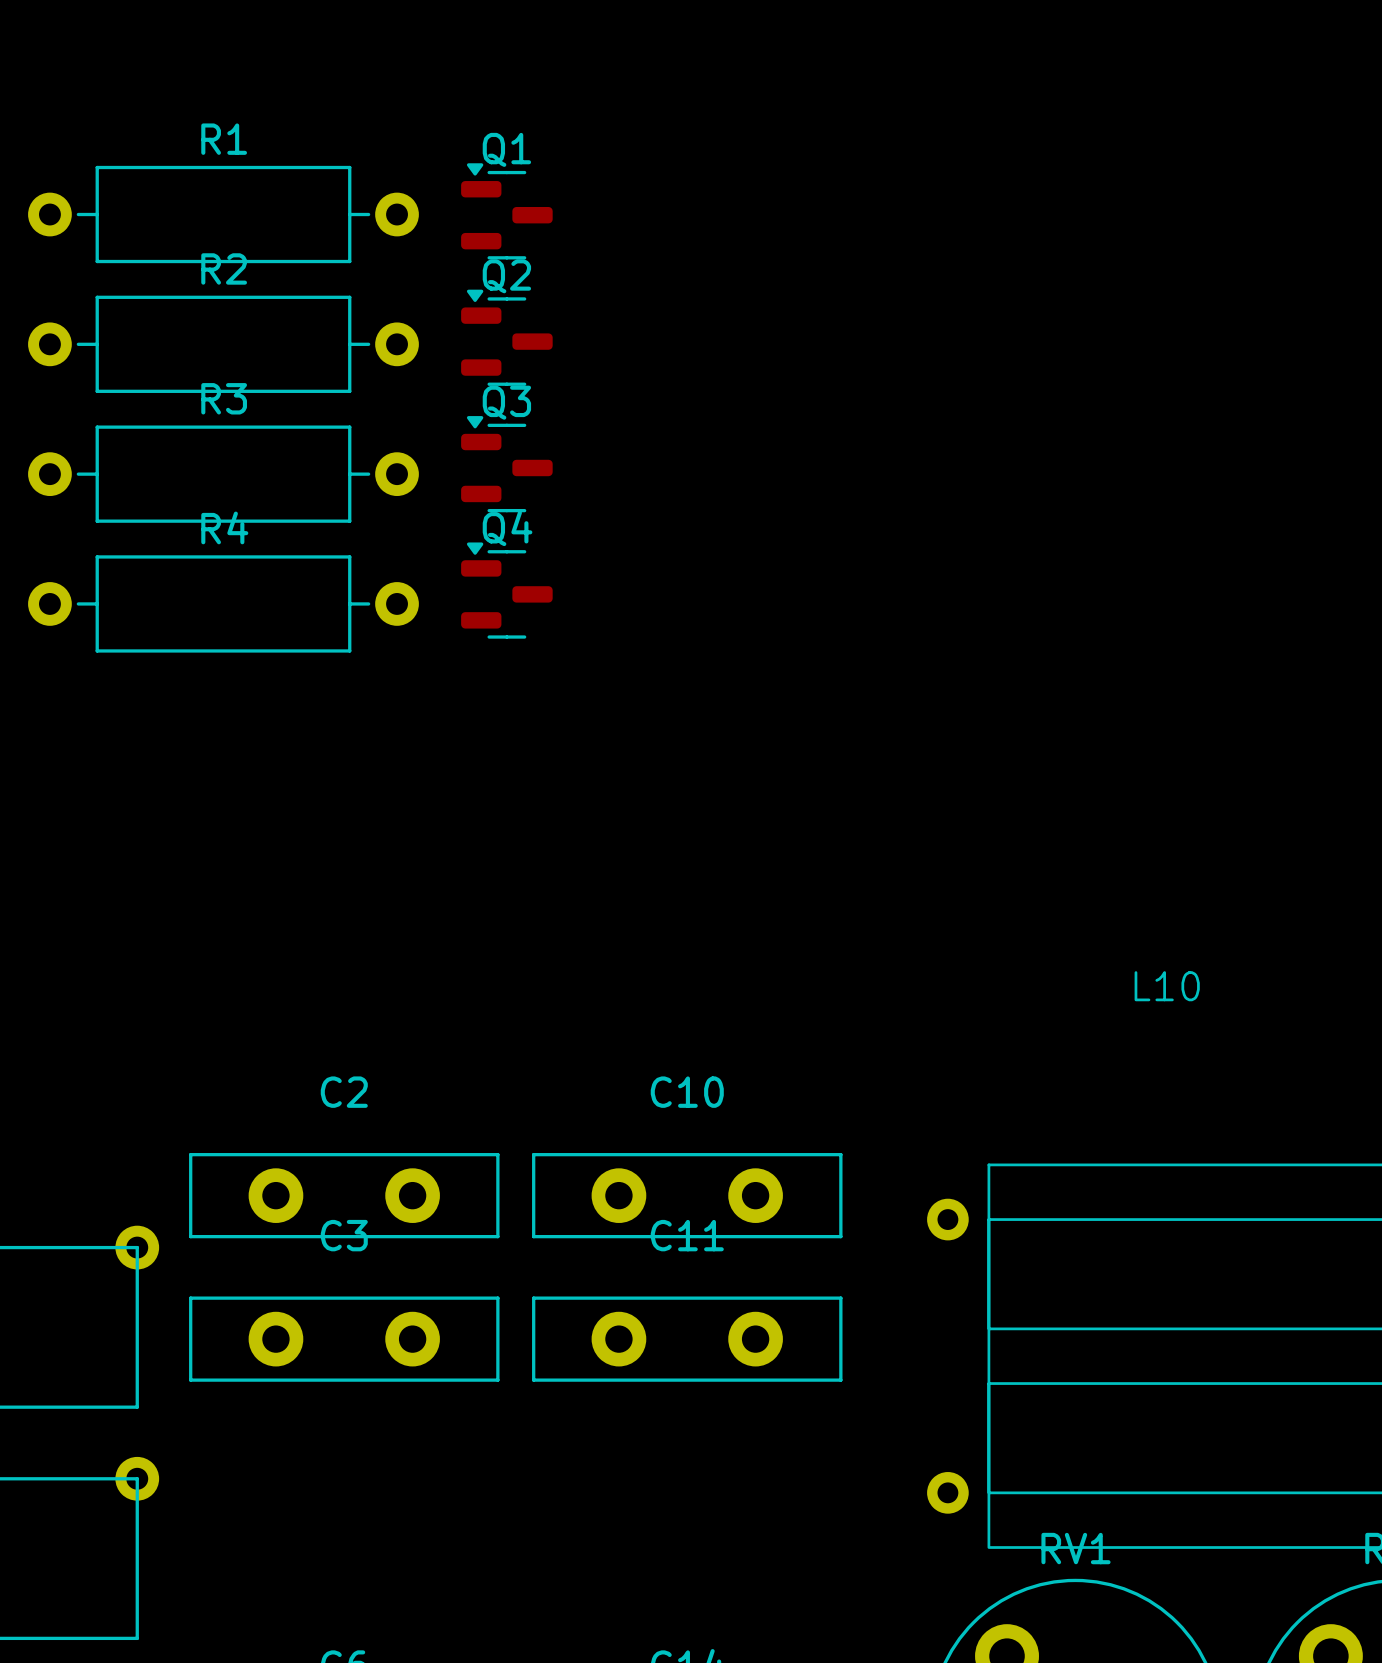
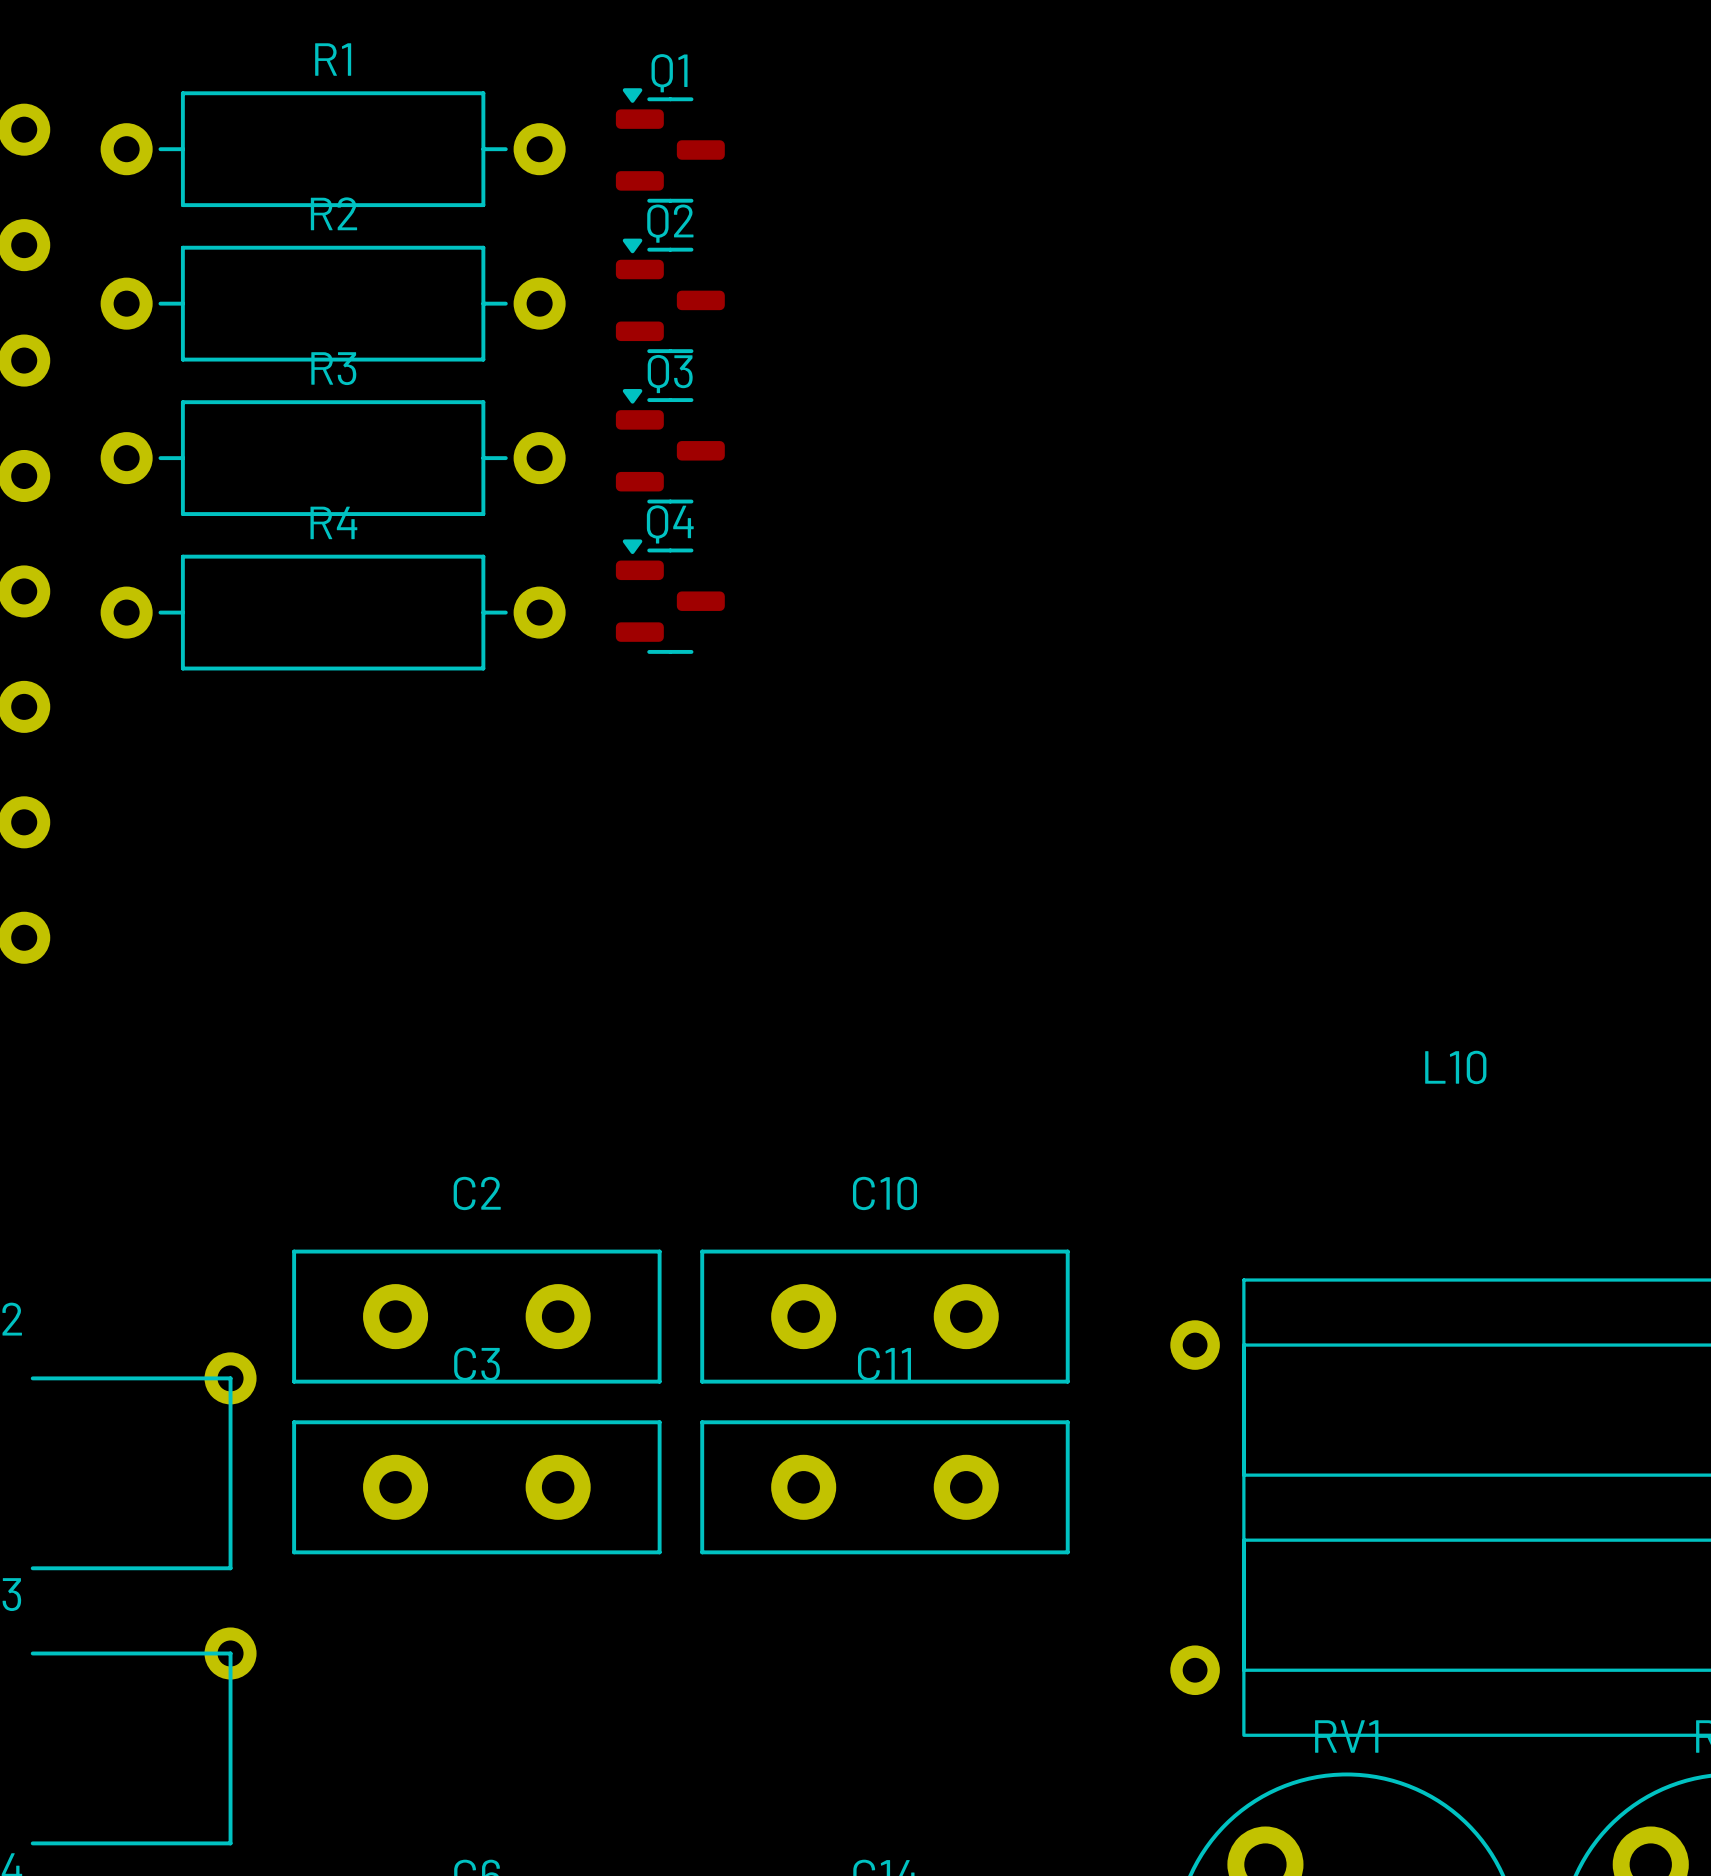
C2 footprint: [189, 1153, 500, 1239] -> [292, 1249, 662, 1384]
C10 footprint: [532, 1153, 843, 1239] -> [700, 1249, 1070, 1384]
C3 footprint: [189, 1296, 500, 1382] -> [292, 1420, 662, 1555]
C11 footprint: [532, 1296, 843, 1382] -> [700, 1420, 1070, 1555]

